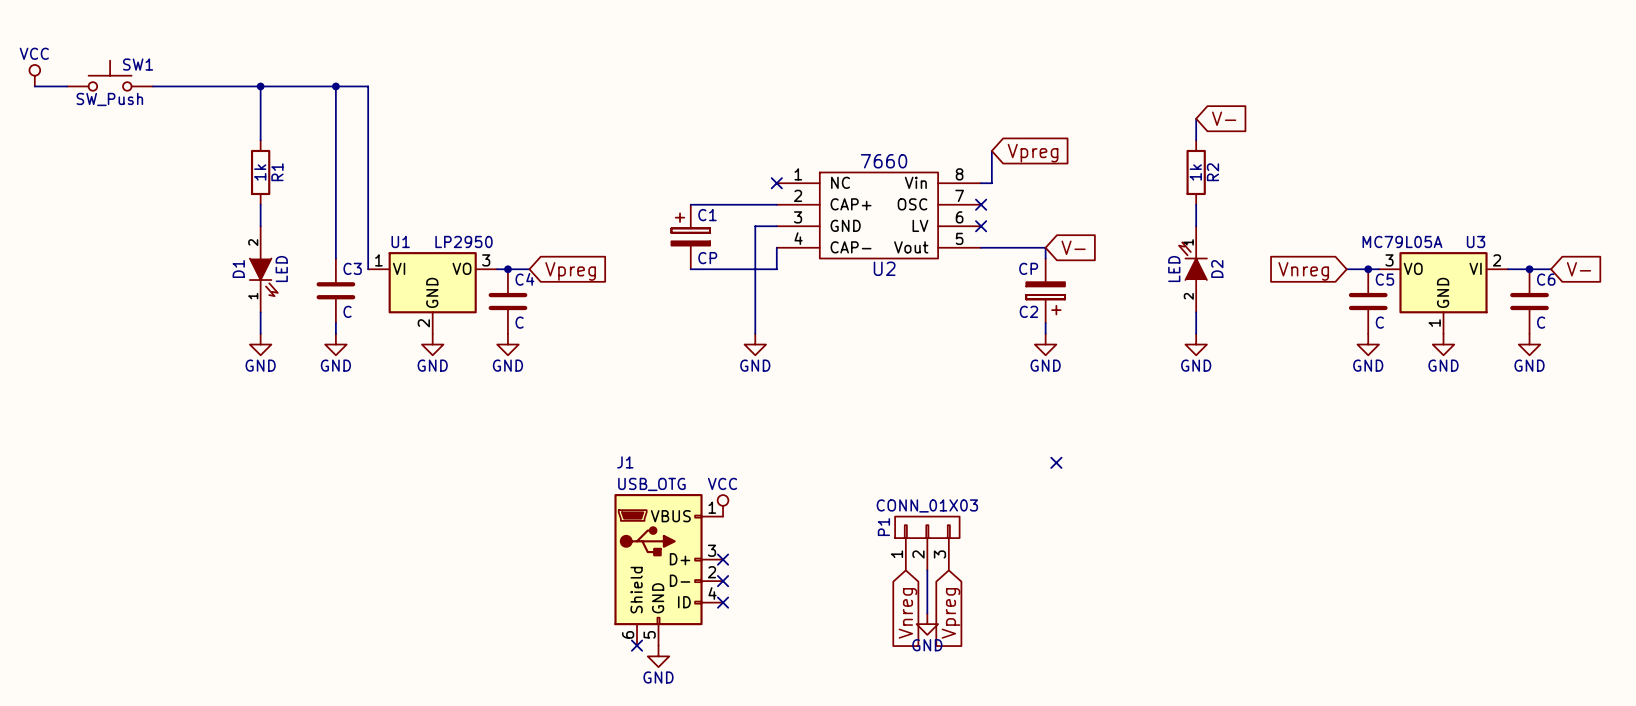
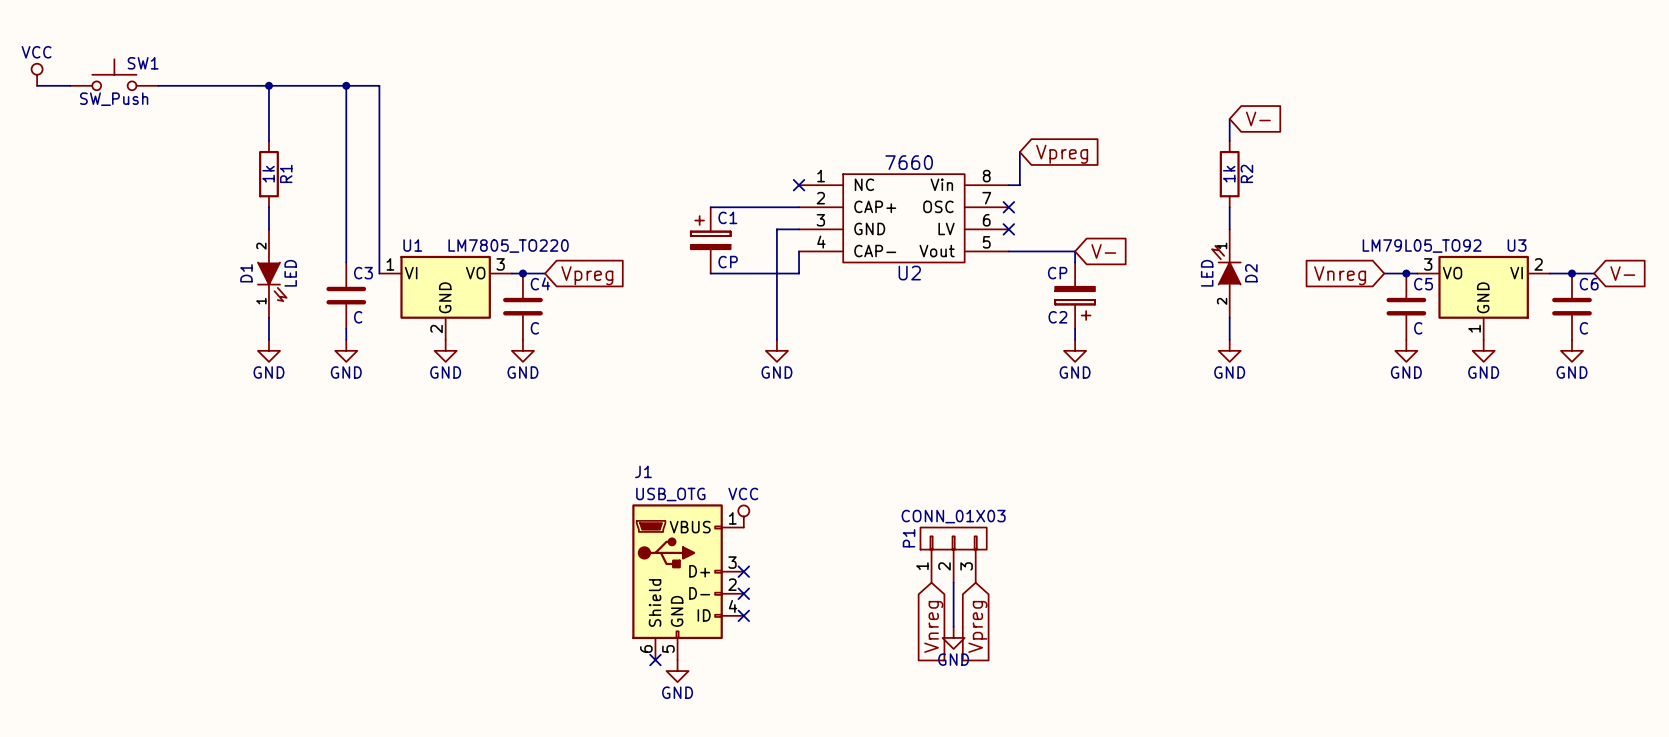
U1 value: LP2950 (464, 241) -> LM7805_TO220 (508, 246)
U3 value: MC79L05A (1402, 241) -> LM79L05_TO92 (1422, 246)
no-connect mark: (1056, 462) -> none

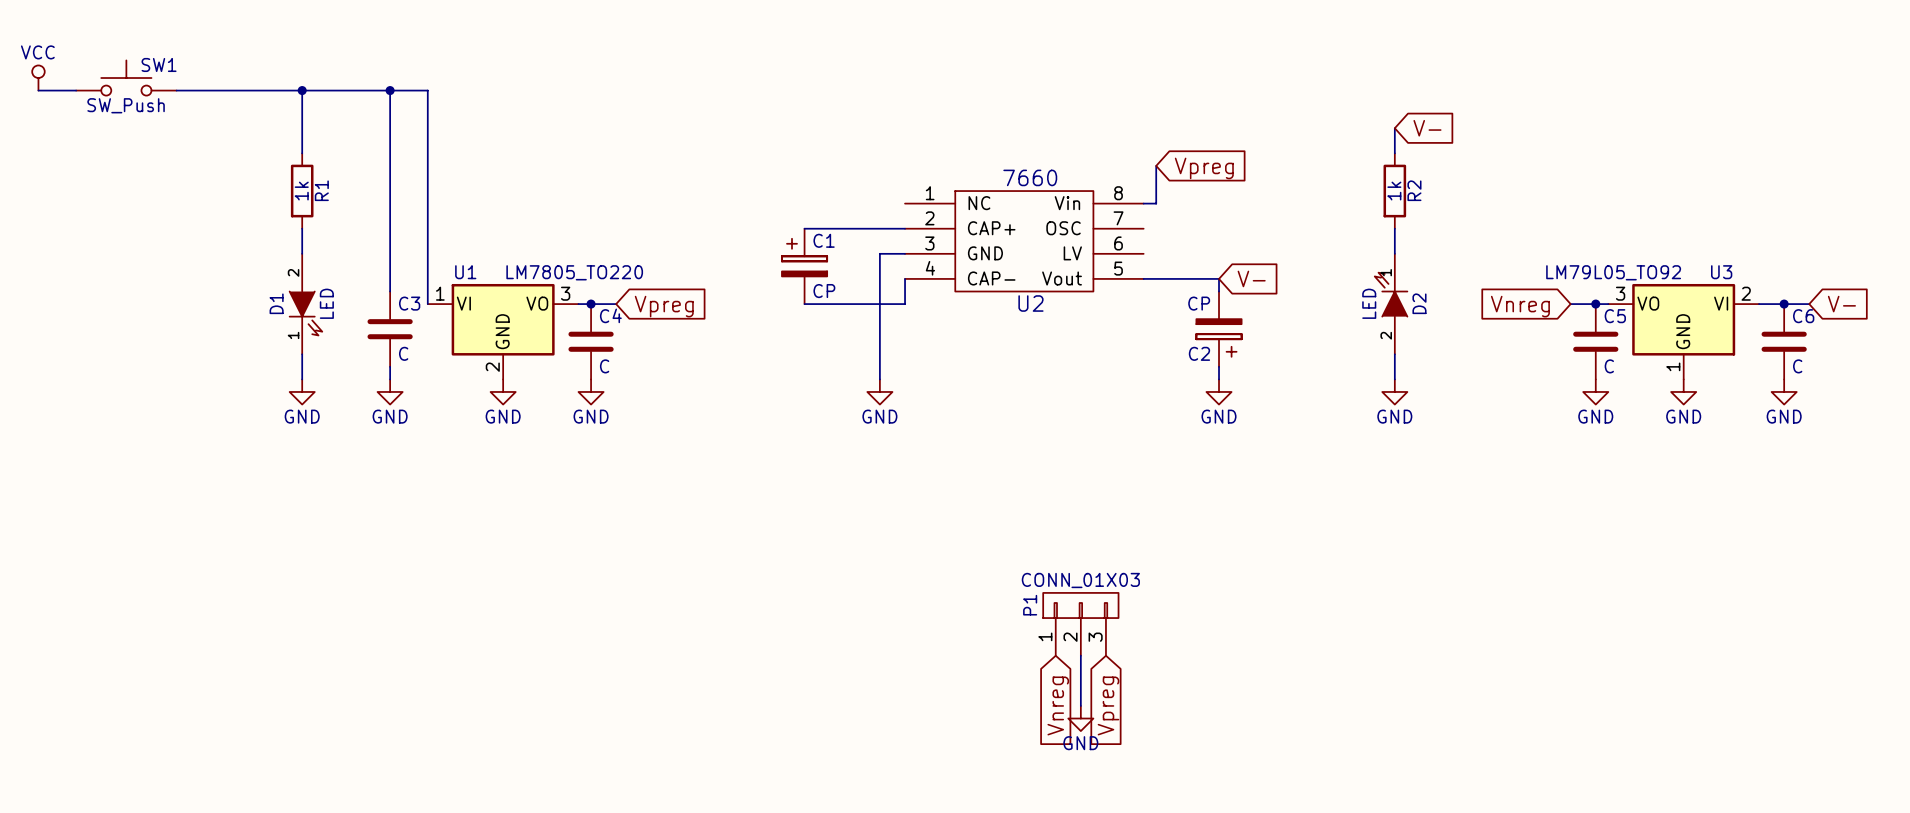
no-connect mark: (799, 185) -> none
no-connect mark: (1008, 207) -> none
no-connect mark: (1008, 229) -> none
power symbol: VCC (743, 516) -> none
no-connect mark: (743, 571) -> none
J1: USB_OTG (688, 582) -> none
no-connect mark: (743, 593) -> none
no-connect mark: (743, 615) -> none
no-connect mark: (655, 660) -> none
power symbol: GND (677, 671) -> none

